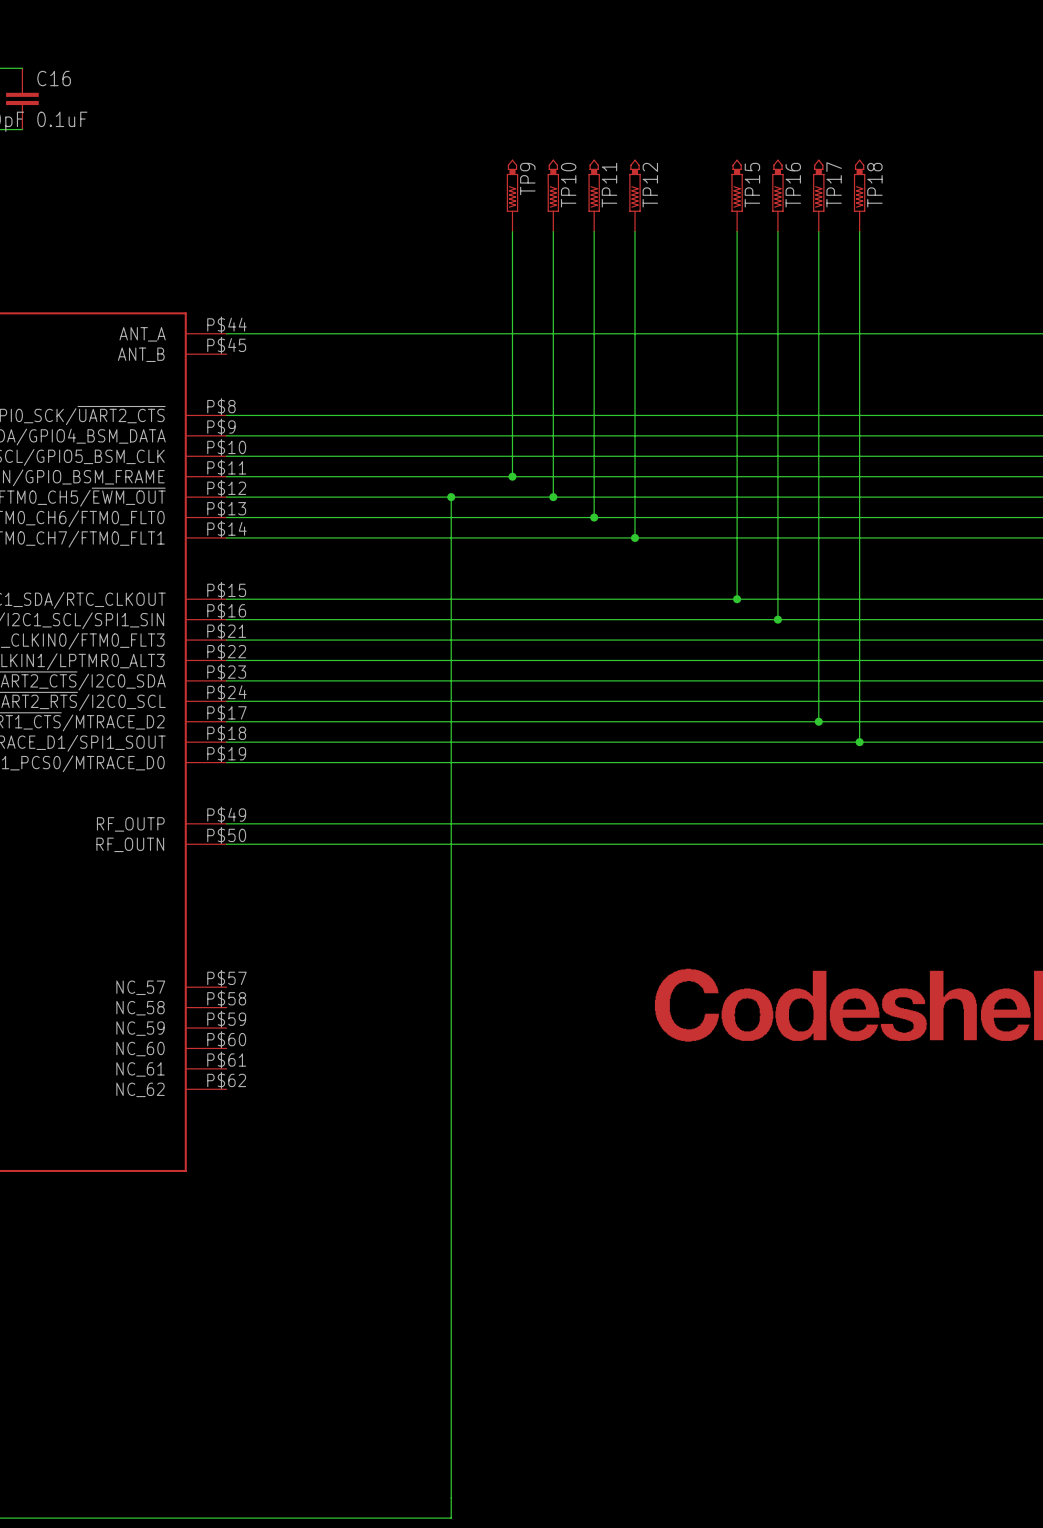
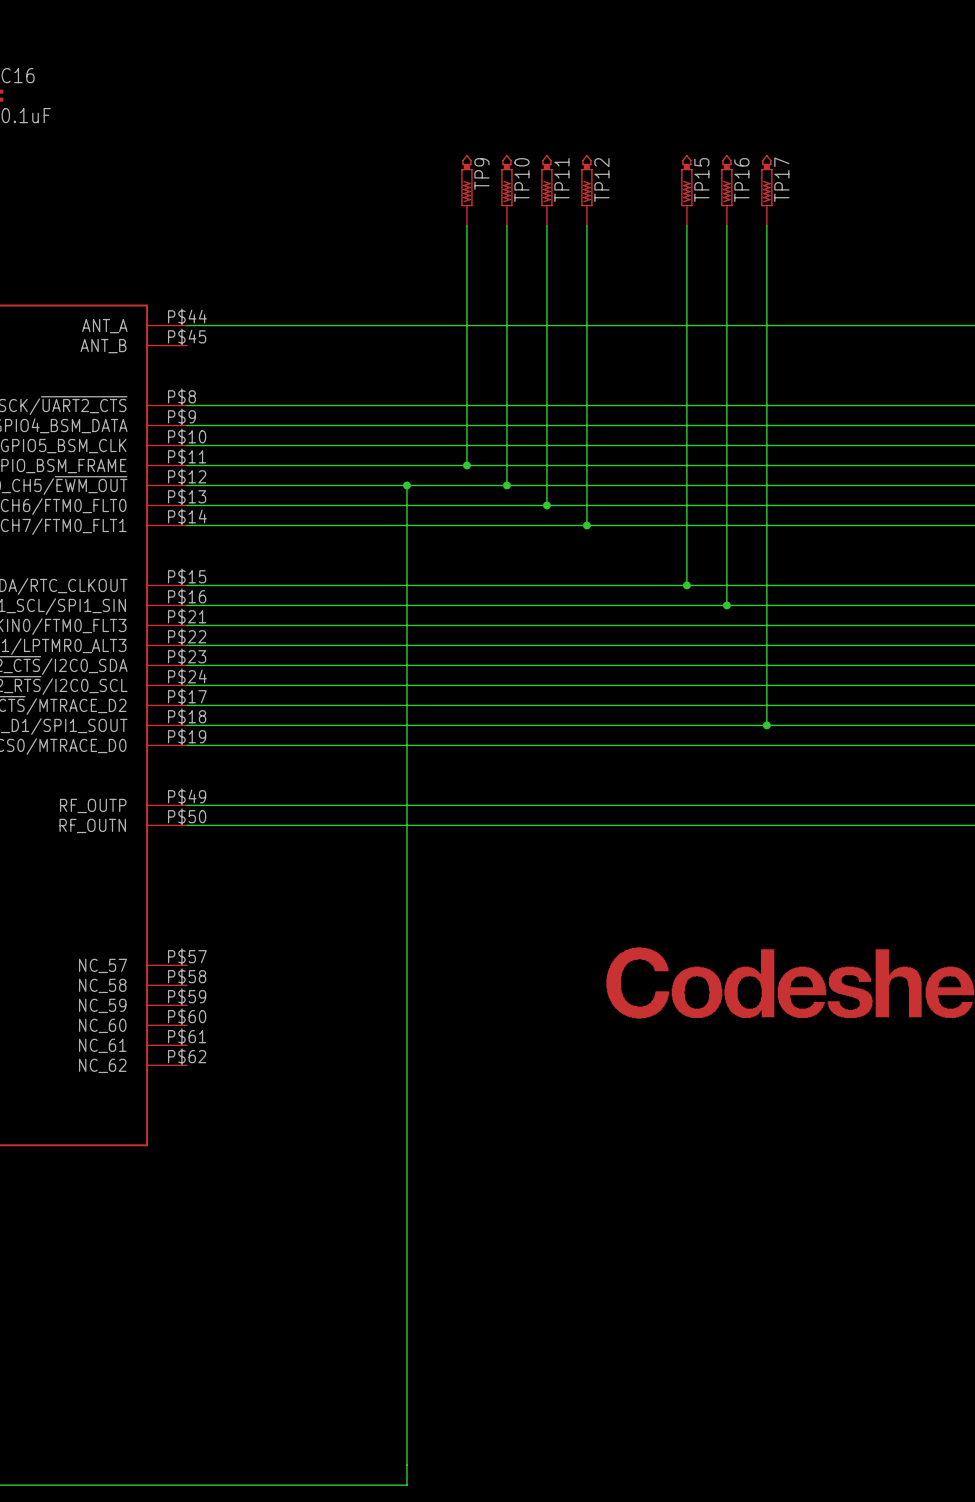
TP18: (859, 195) -> none
wire: (859, 231) (859, 742) -> none
wire: none -> (766, 705) (766, 725)
junction: (818, 721) -> none
junction: none -> (766, 725)
junction: (859, 742) -> none

